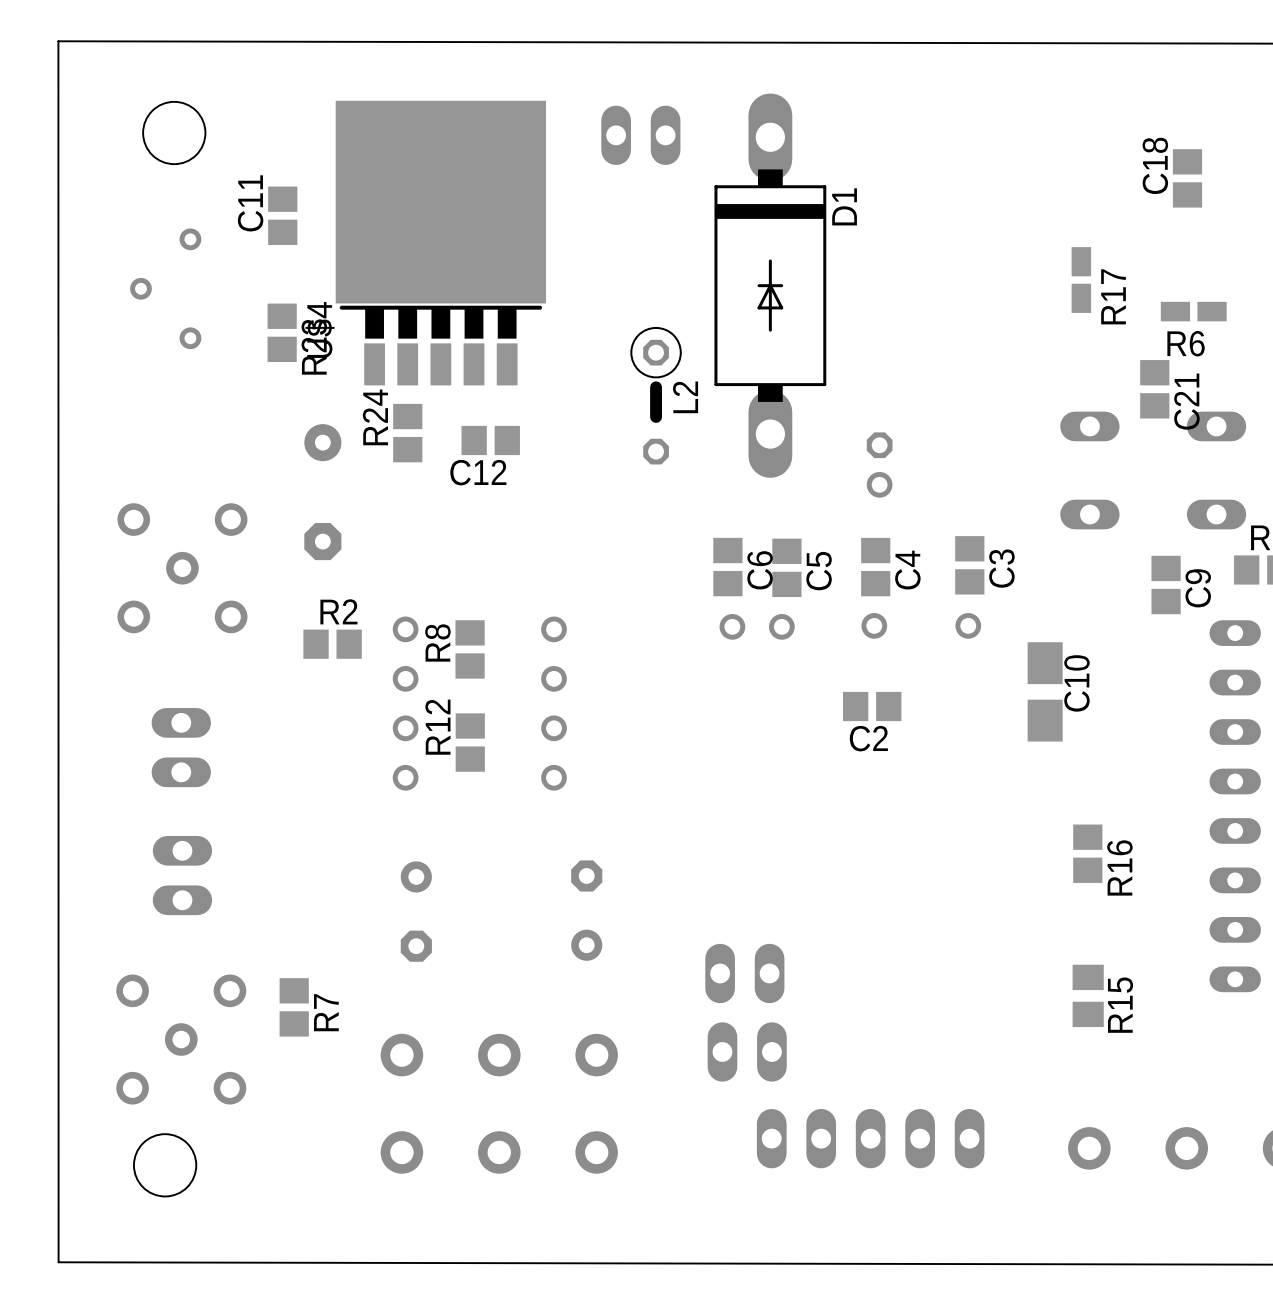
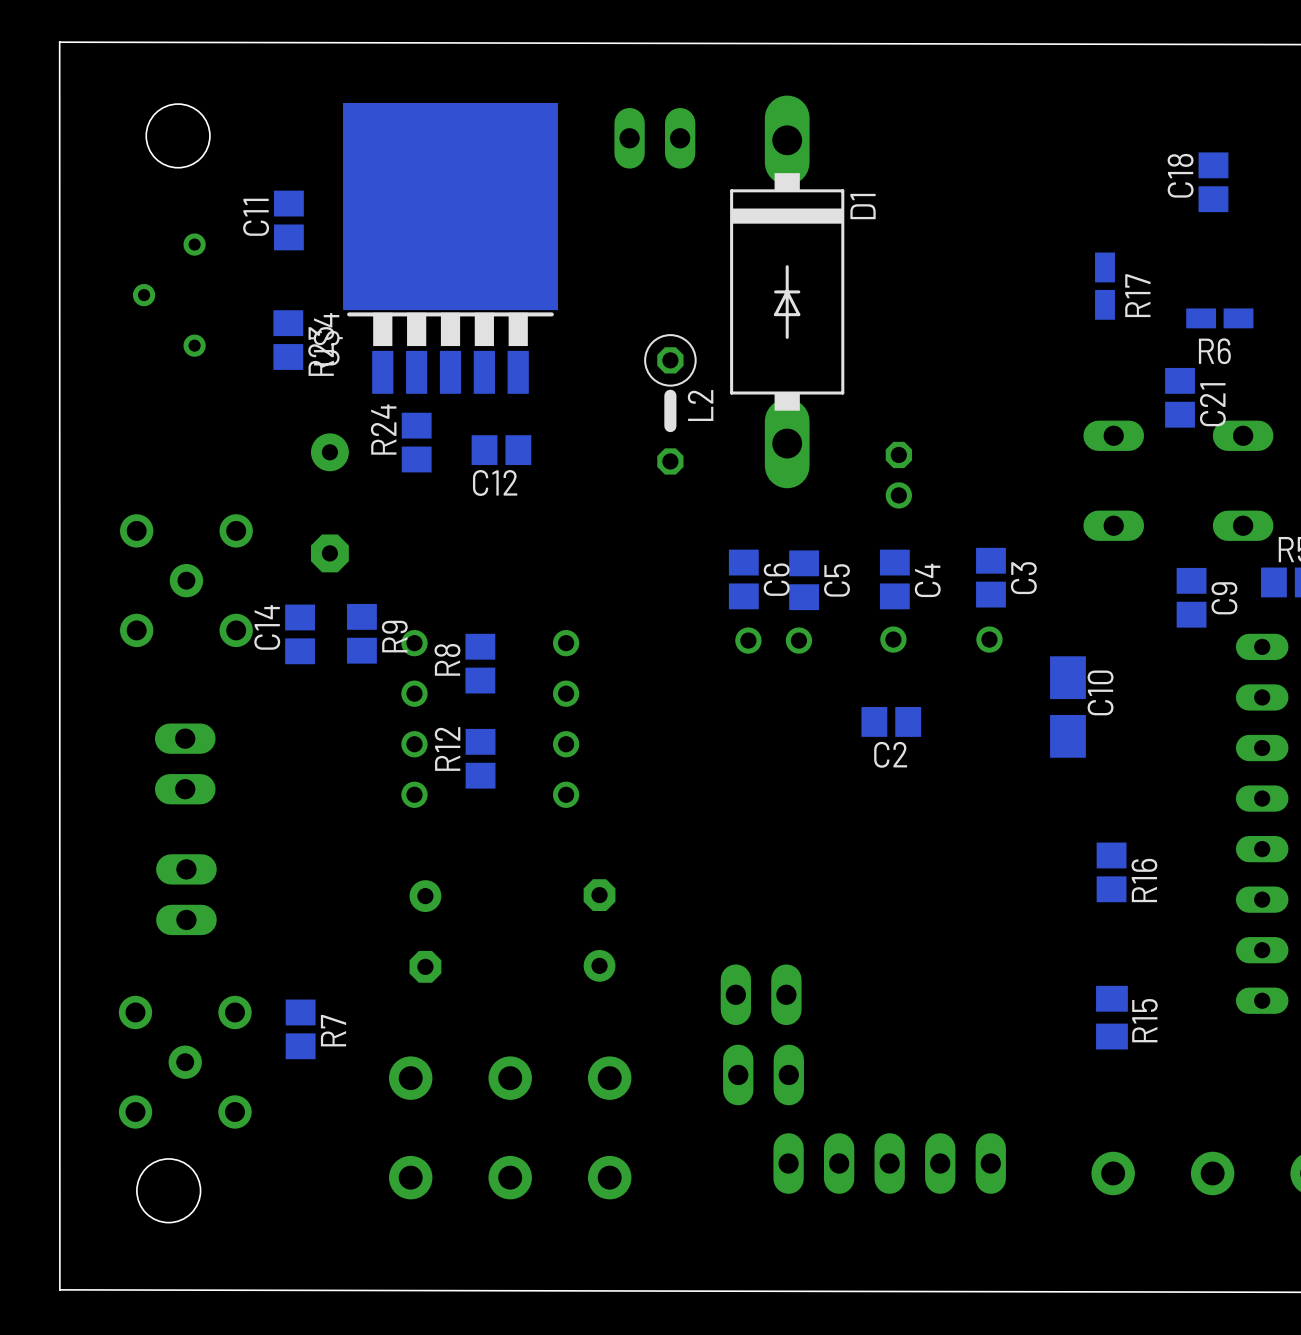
C14: none -> (300, 634)
R9: none -> (361, 633)
R2: (332, 644) -> none

